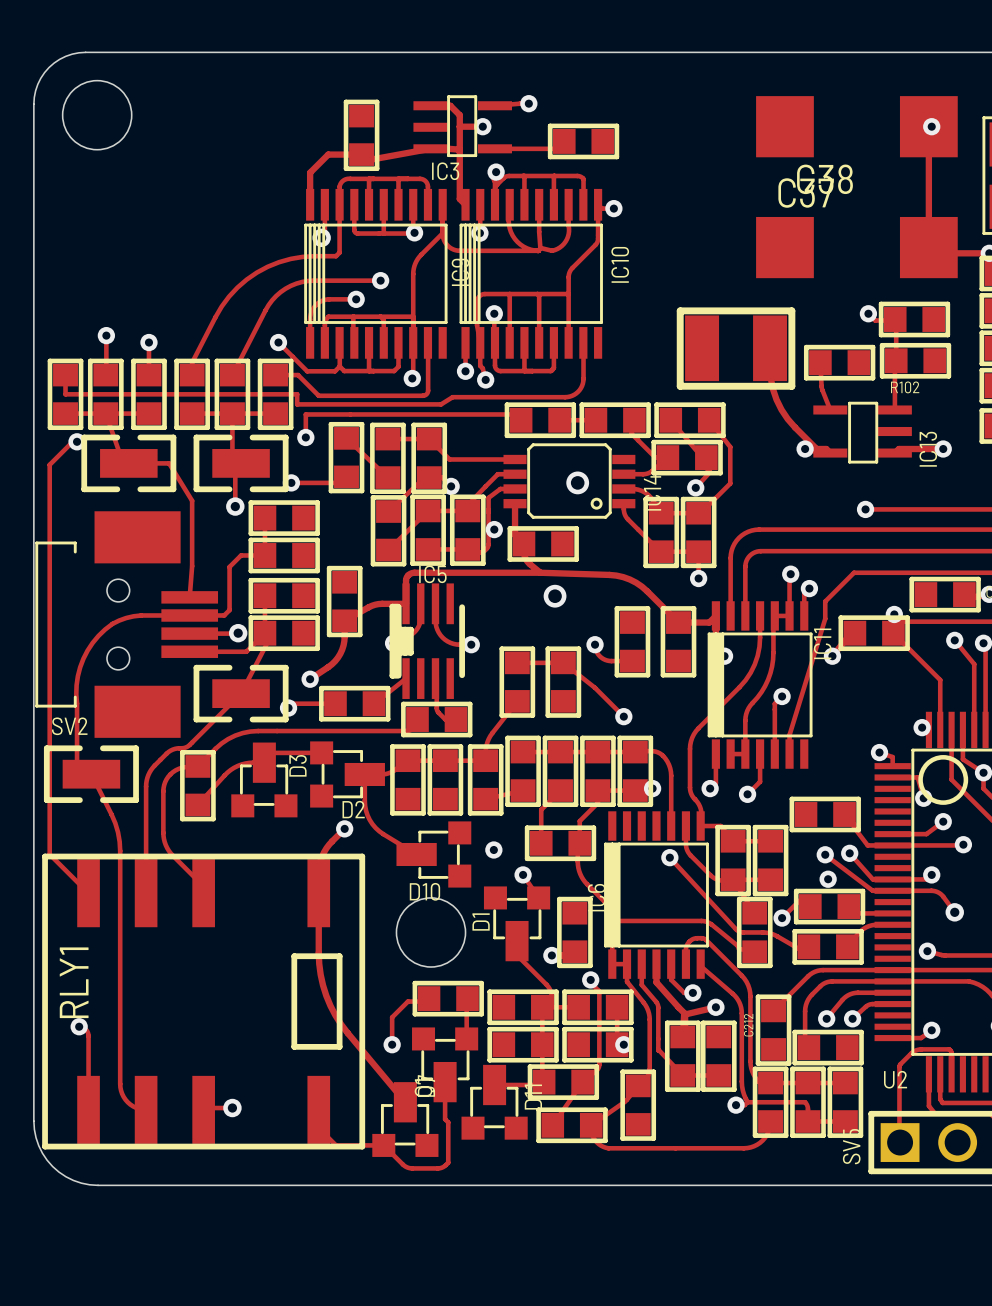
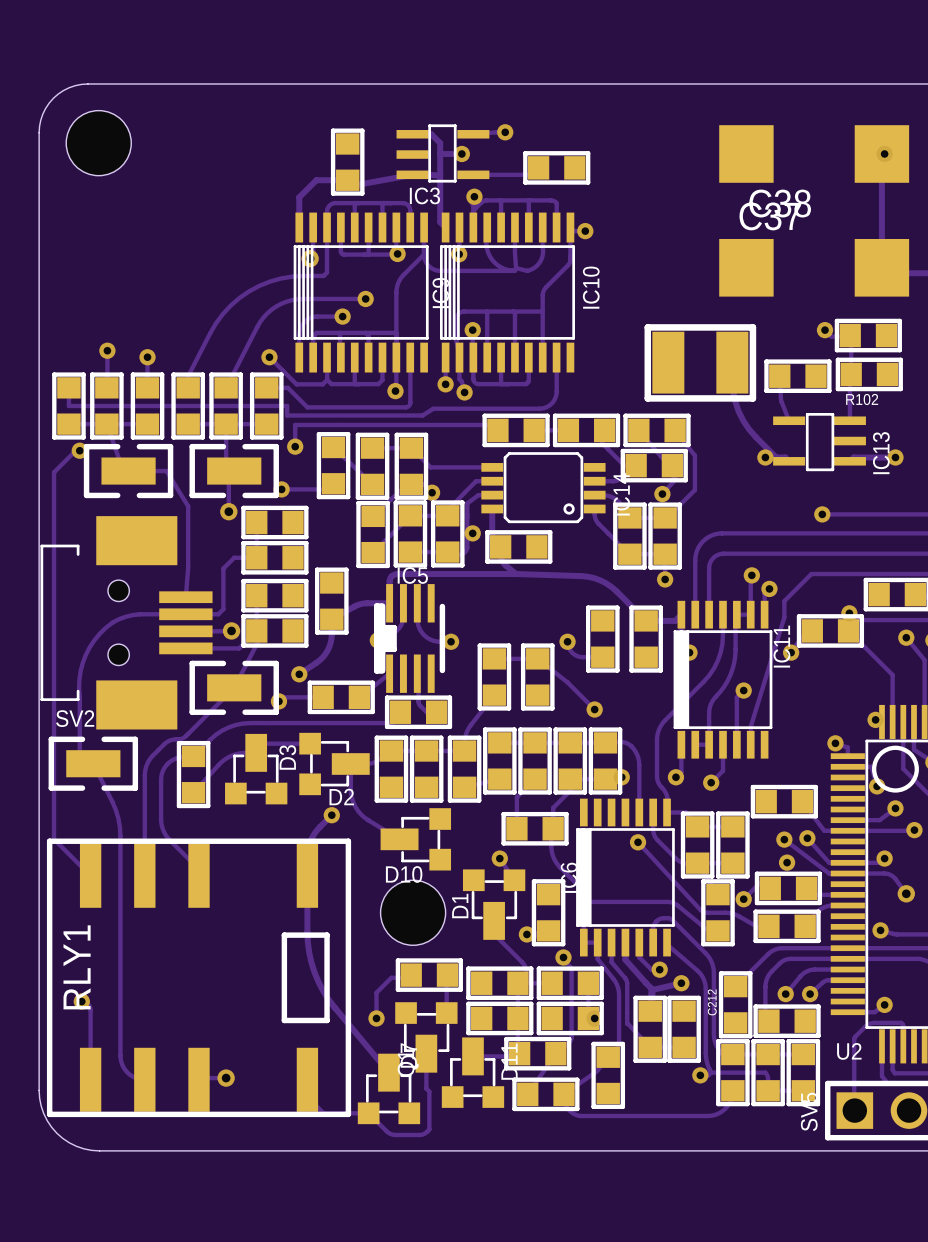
via: (577, 482) -> none
via: (555, 596) -> none
via: (493, 849) -> none

